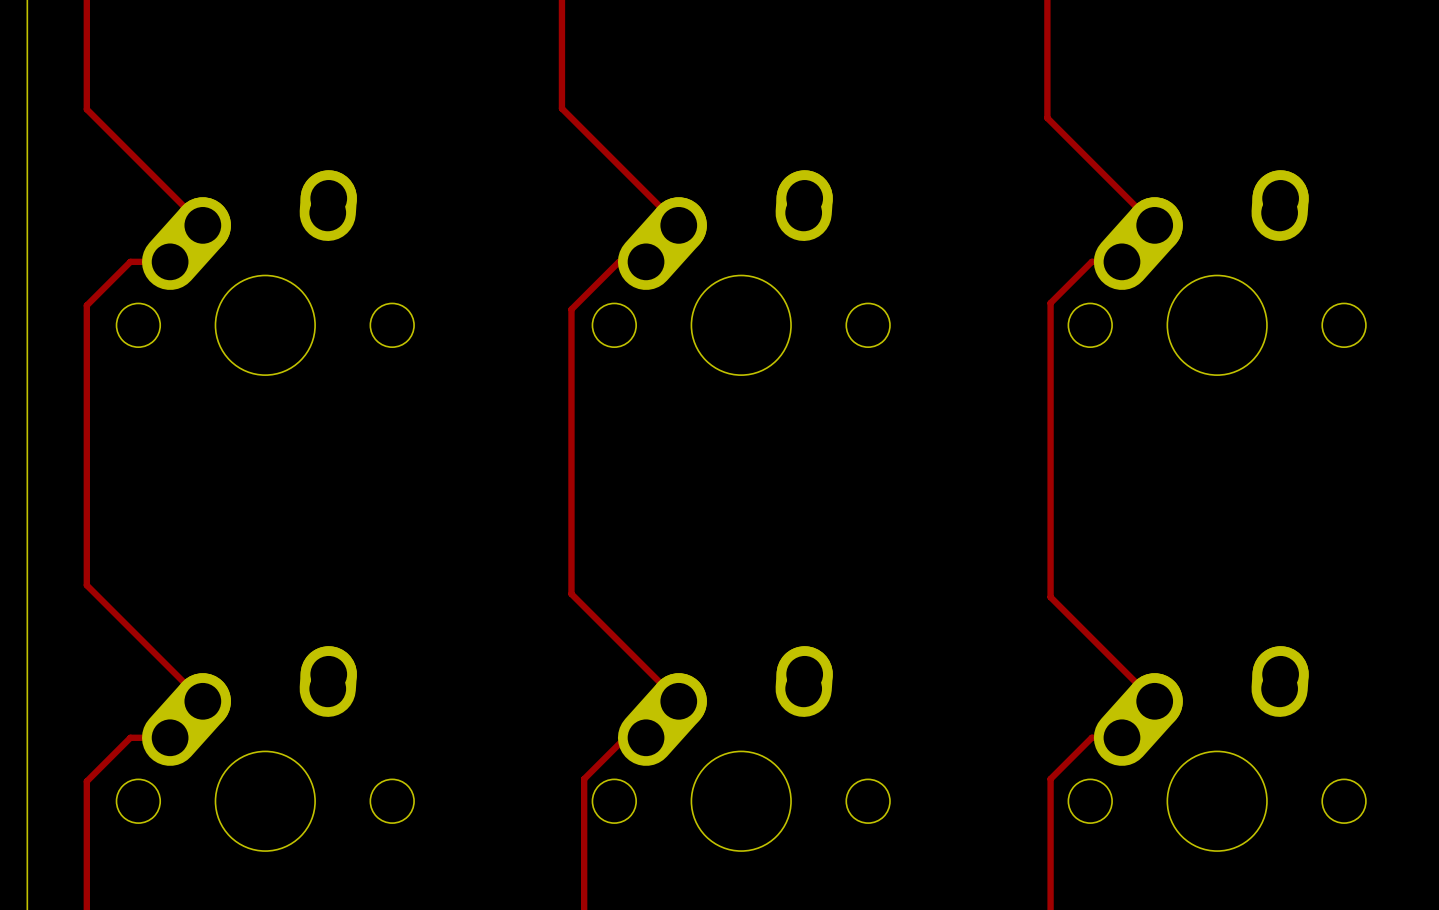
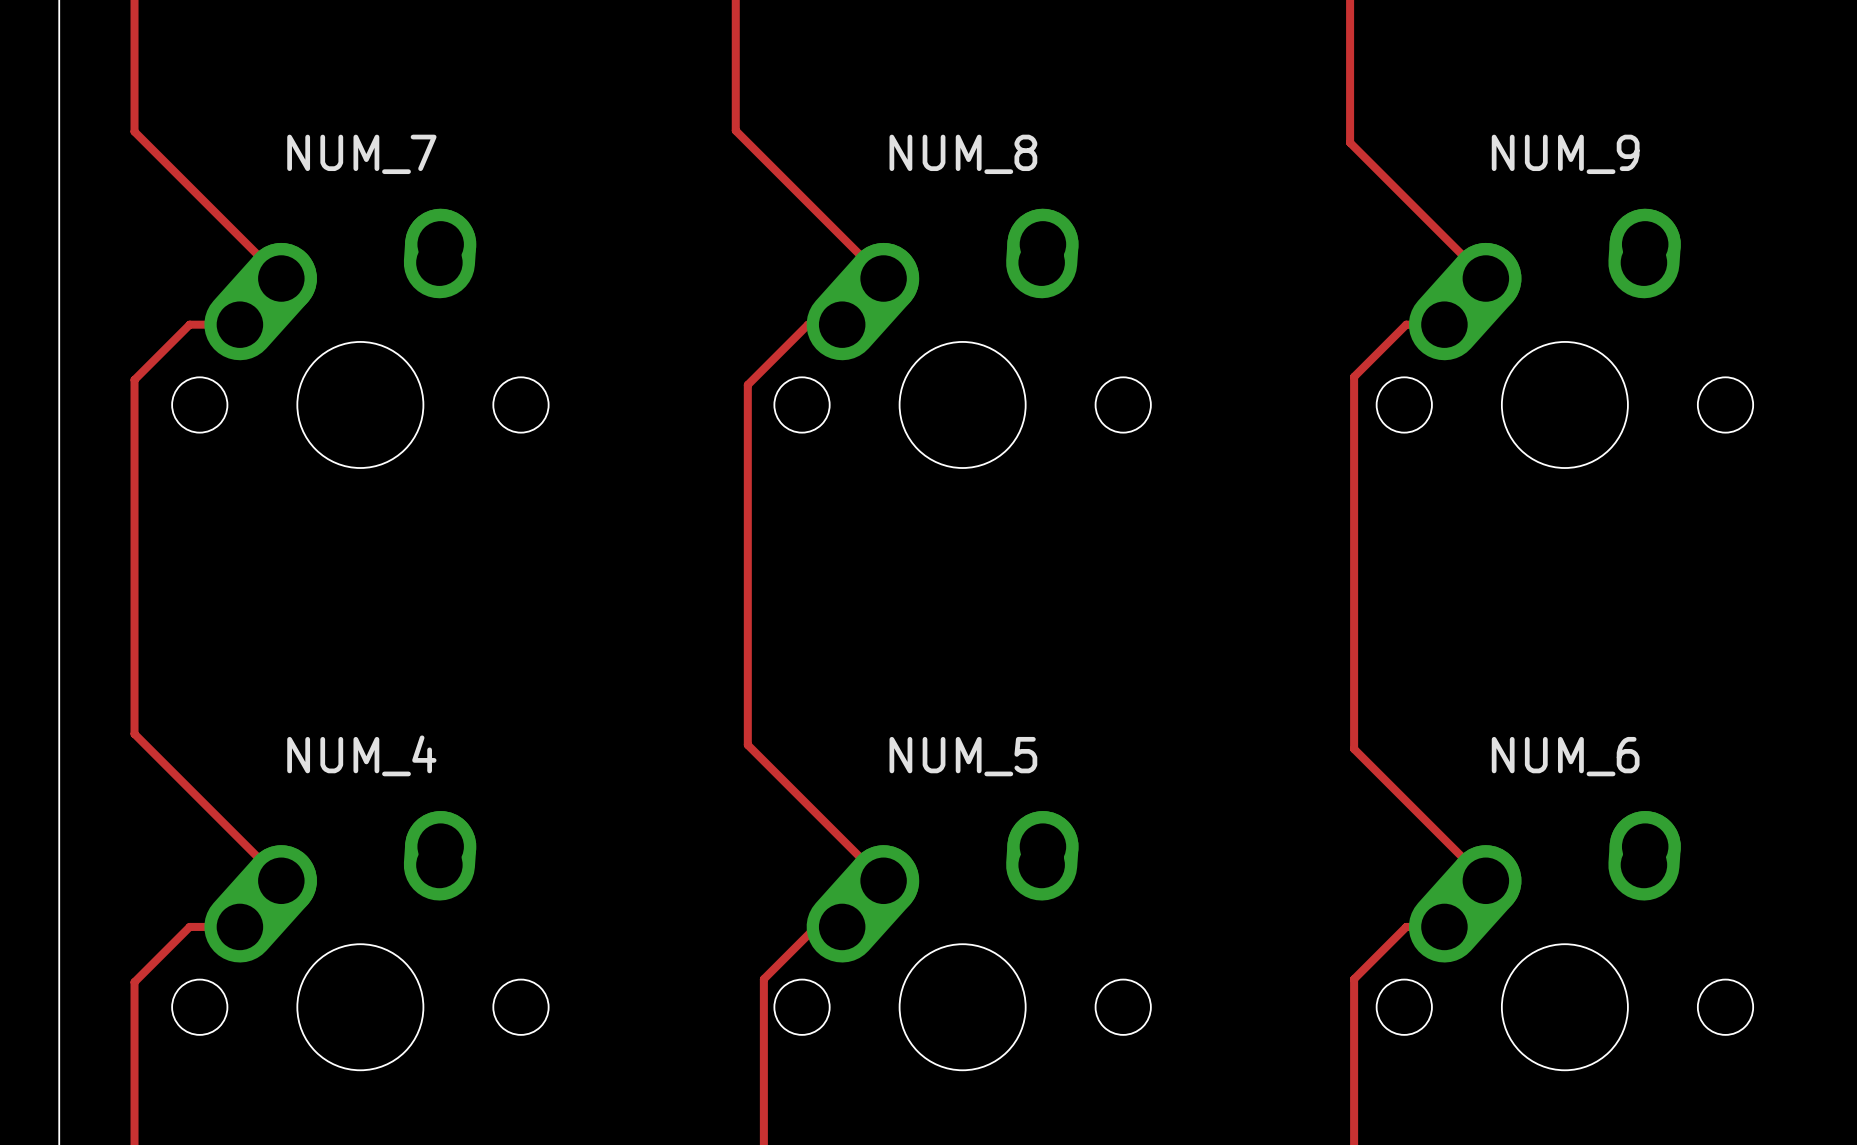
part value: none -> NUM_7 (361, 154)
part value: none -> NUM_8 (963, 154)
part value: none -> NUM_9 (1565, 154)
part value: none -> NUM_4 (361, 755)
part value: none -> NUM_5 (963, 756)
part value: none -> NUM_6 (1565, 756)

